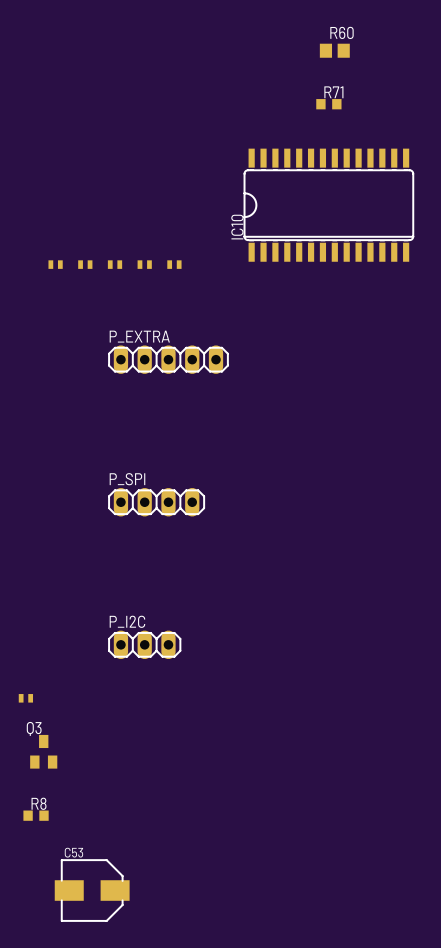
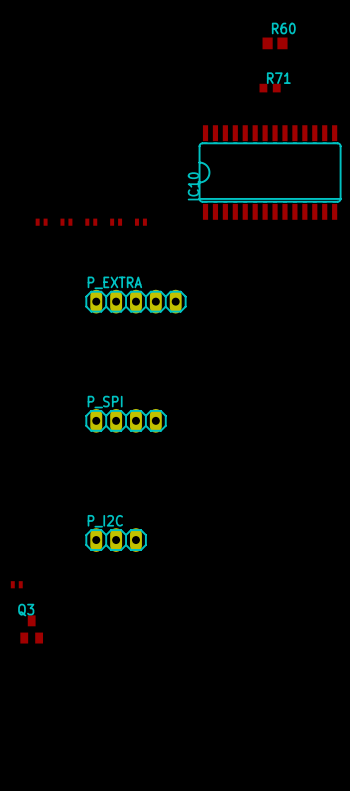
R8: (36, 815) -> none
C53: (92, 890) -> none

